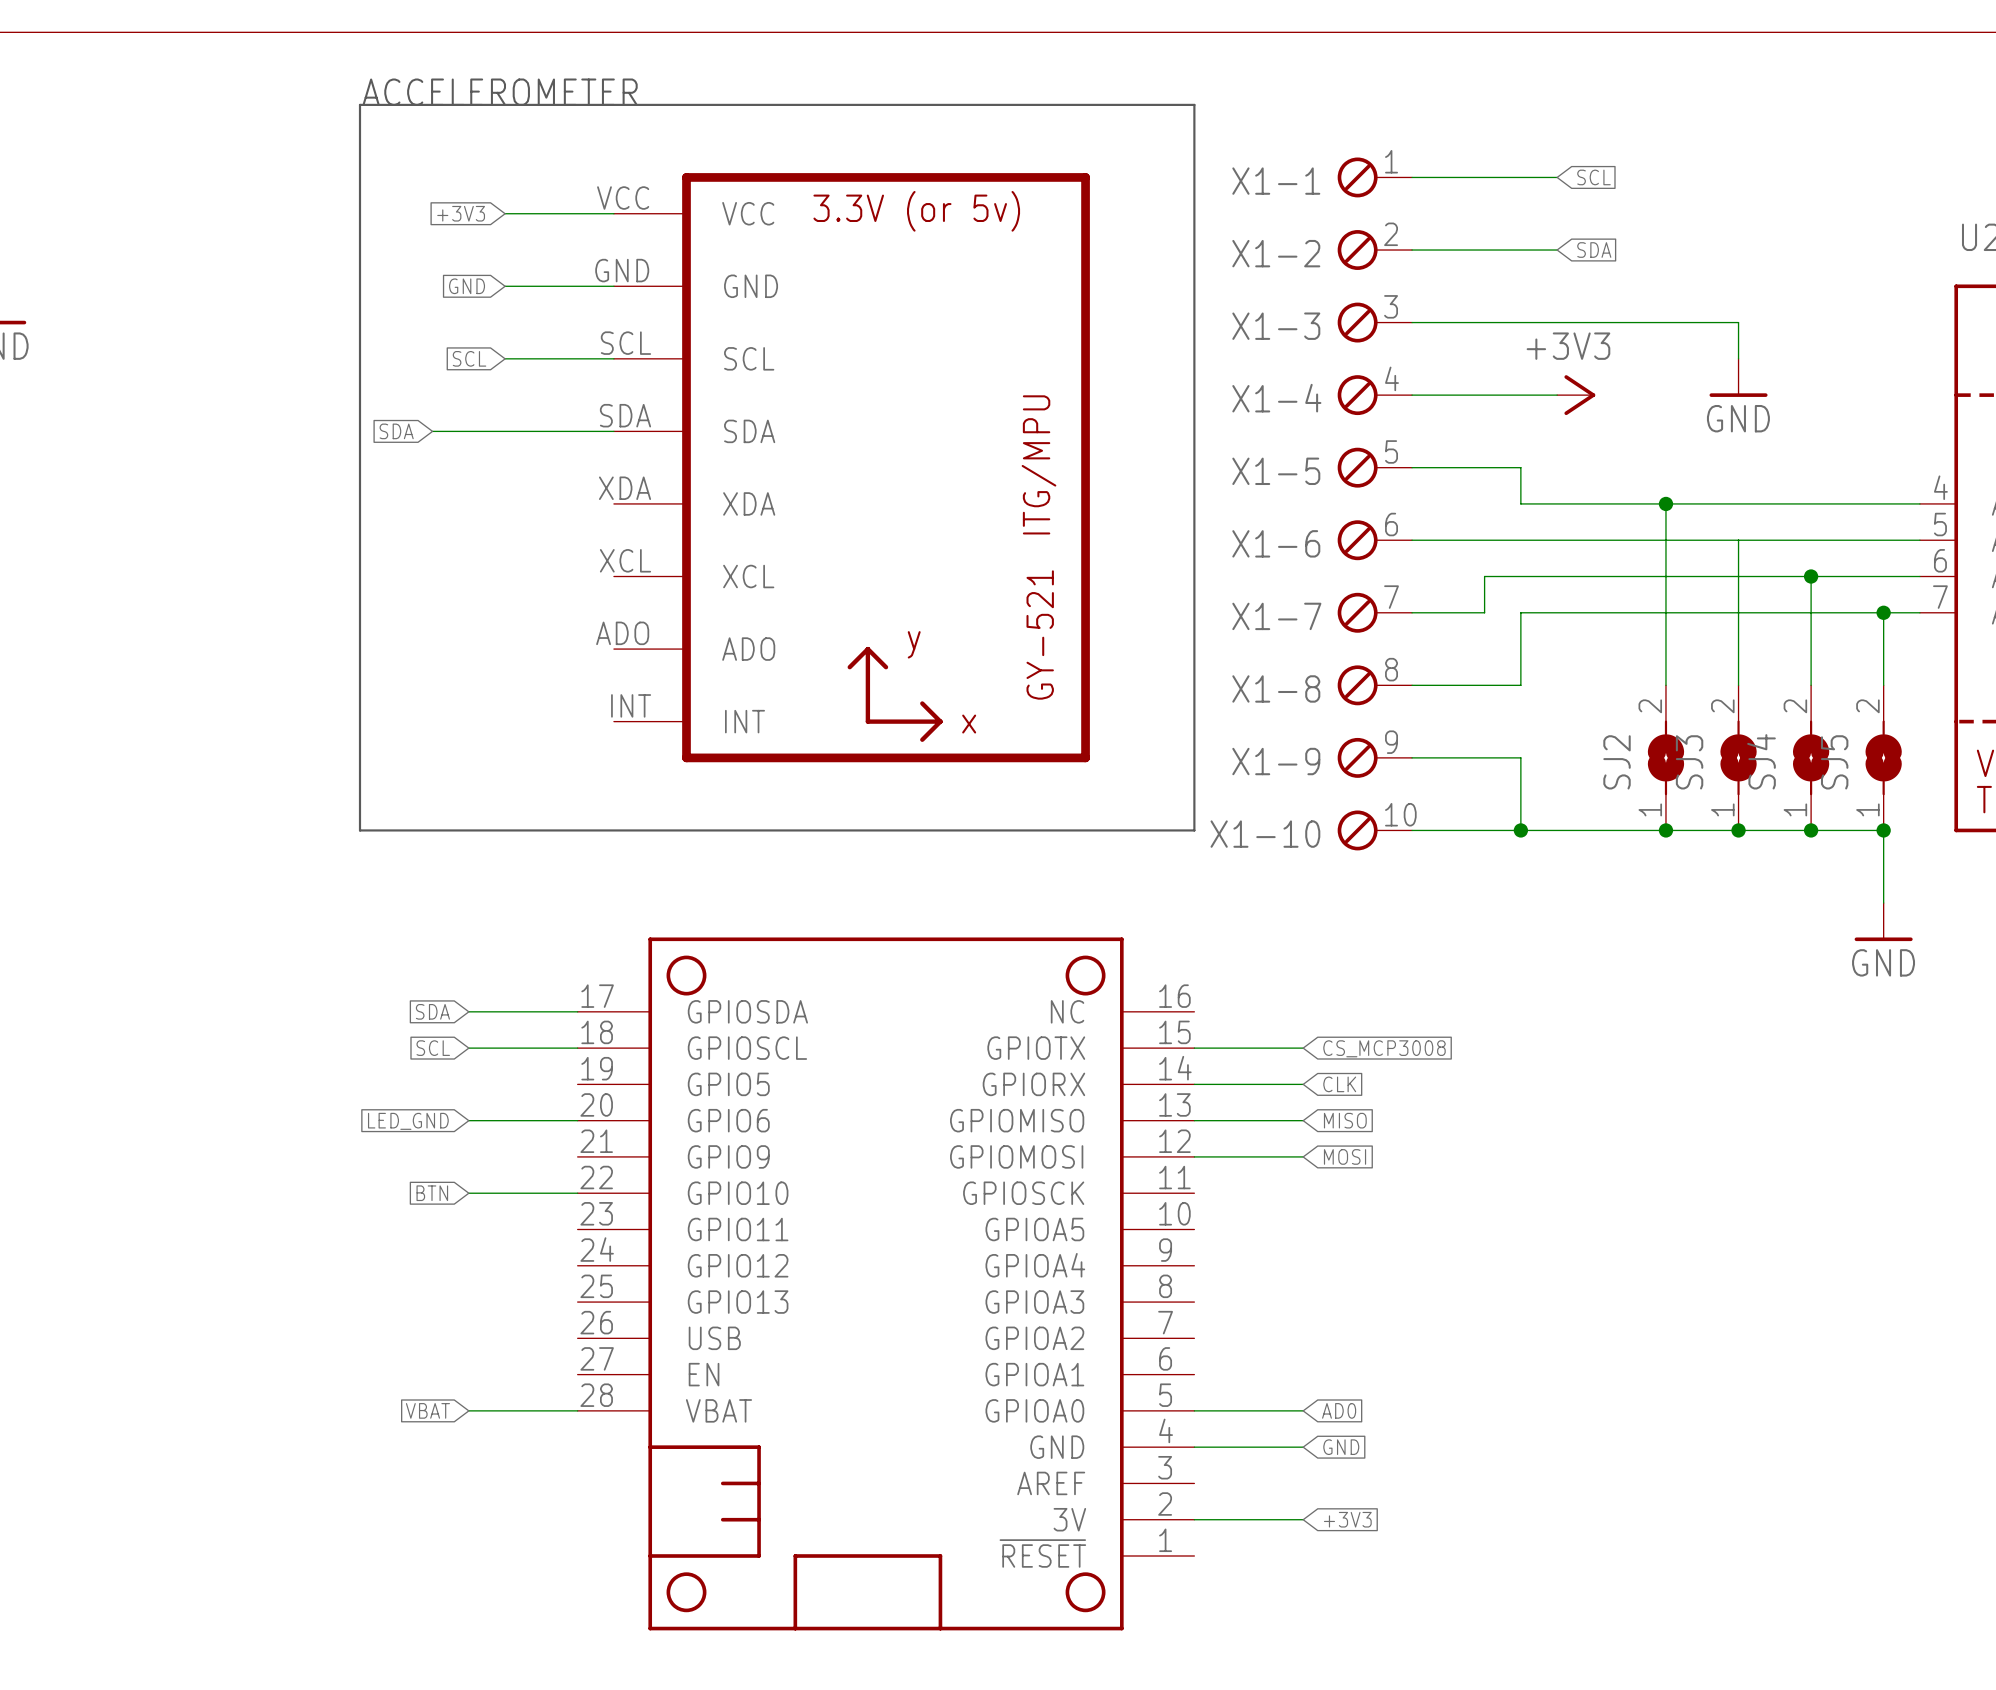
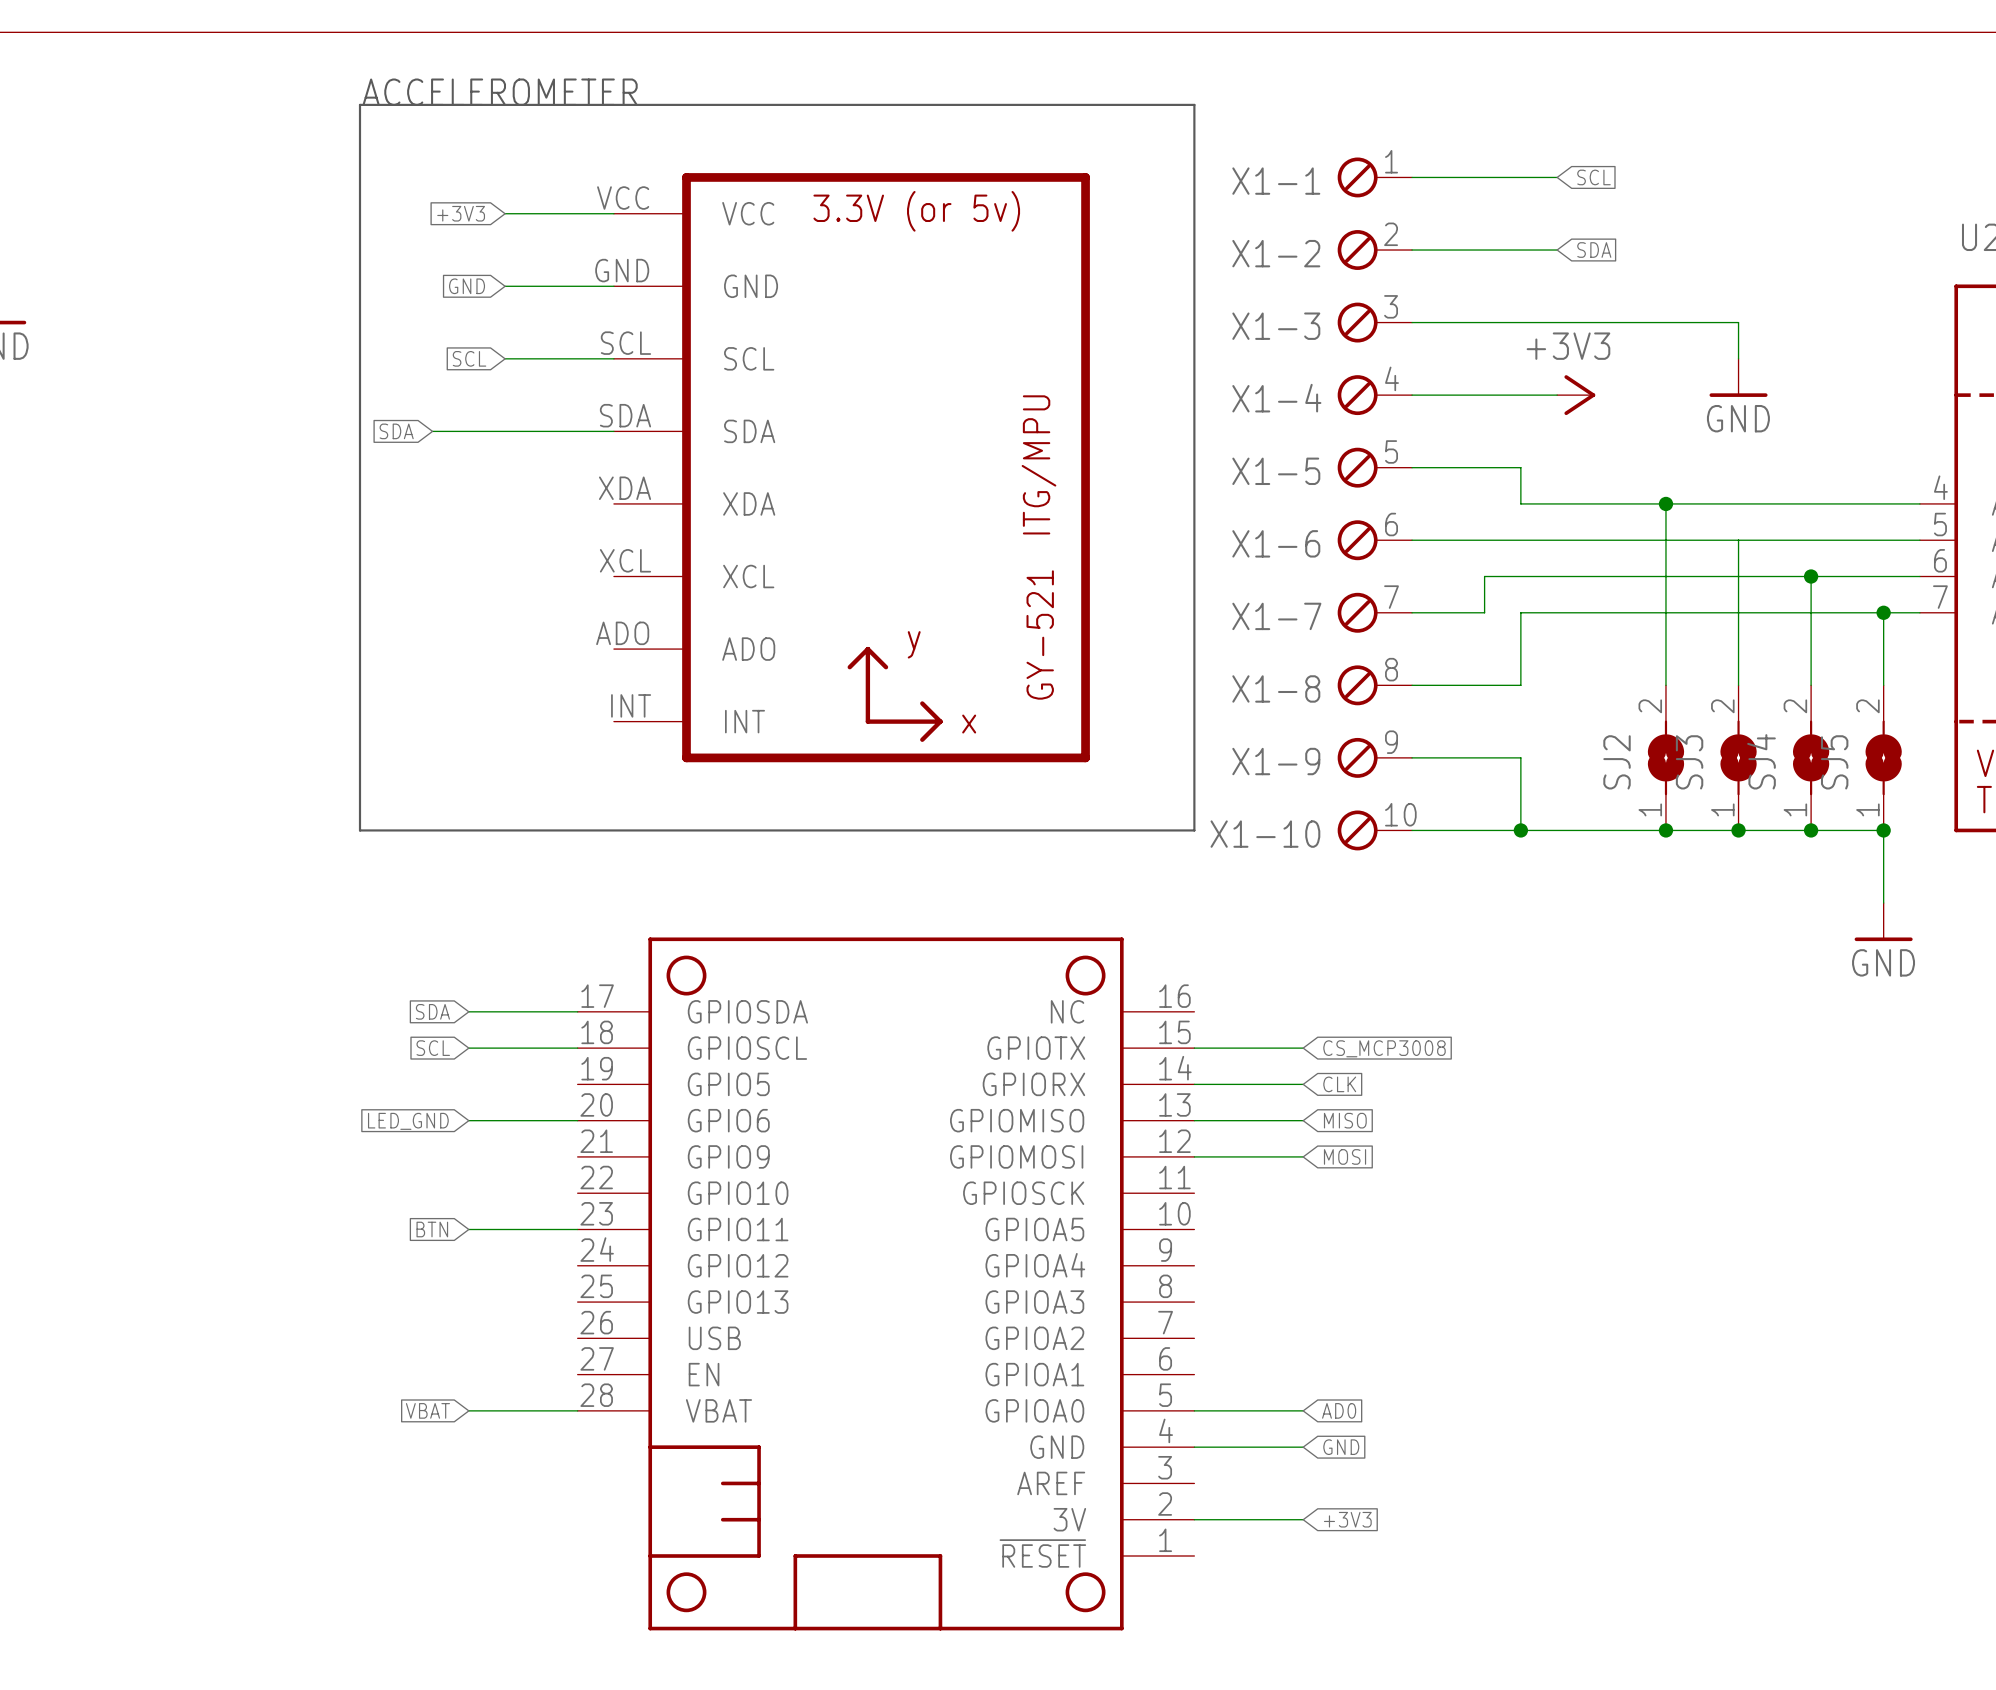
global label position: BTN (432, 1193) -> BTN (432, 1229)
wire: (468, 1193) (577, 1193) -> (468, 1229) (577, 1229)

